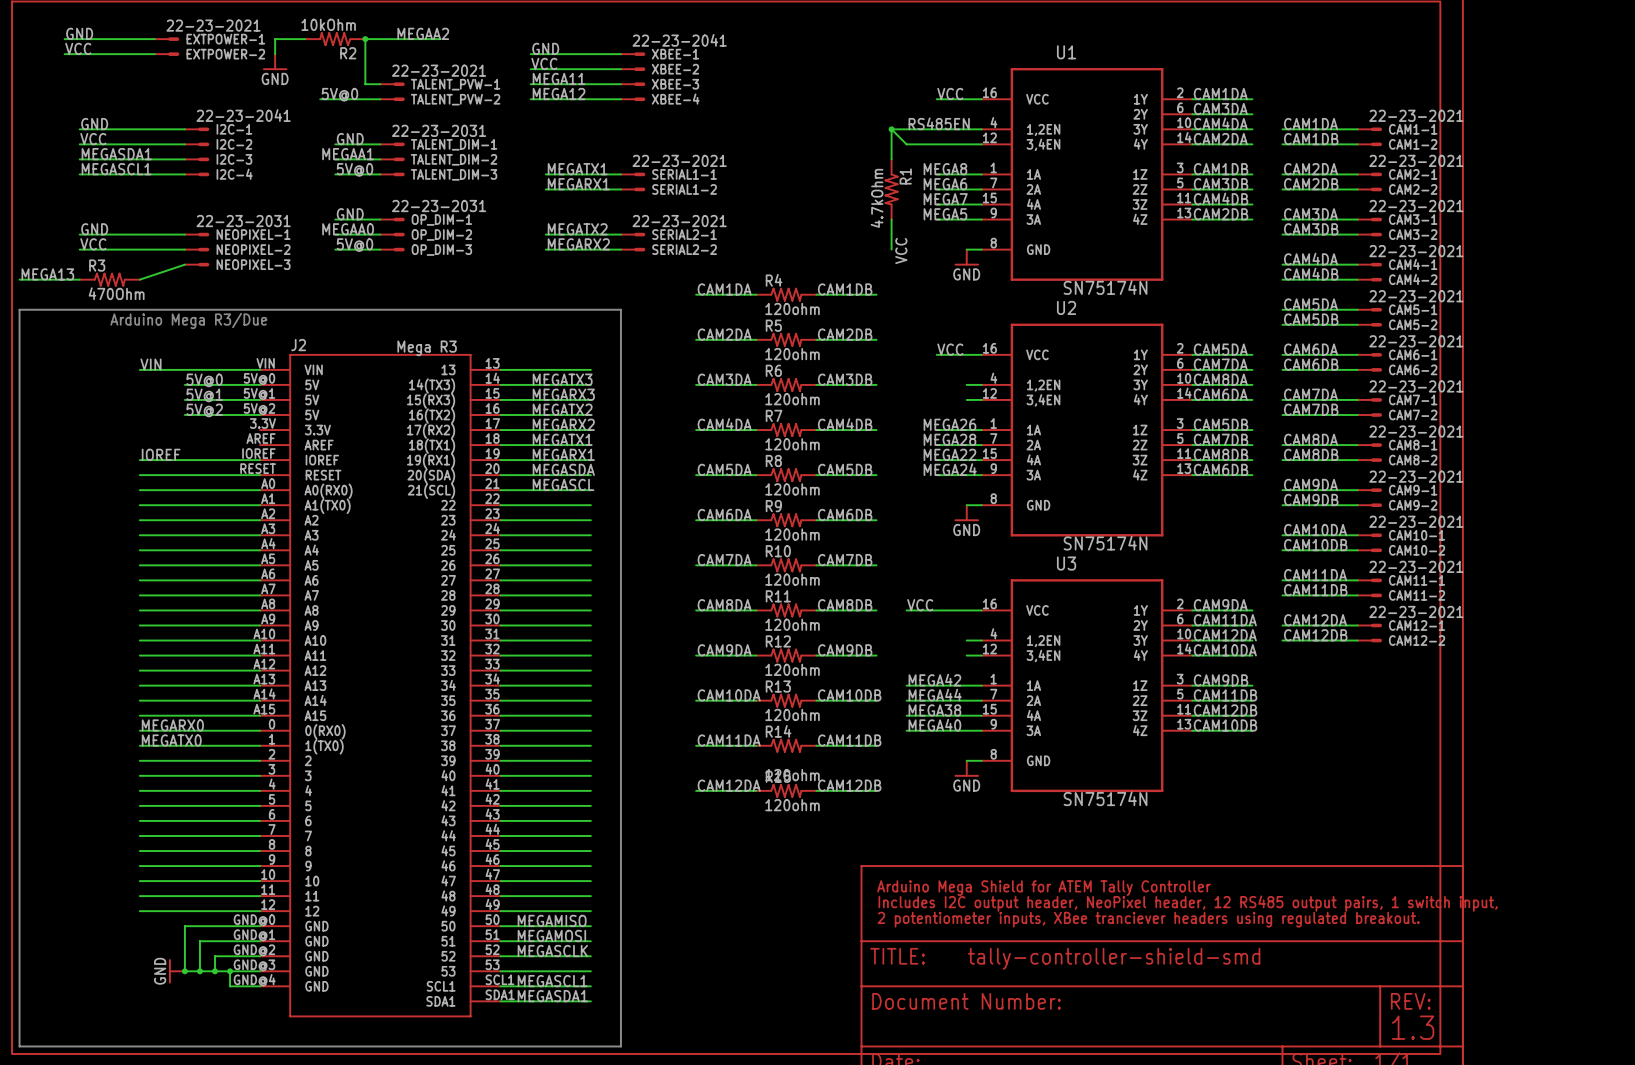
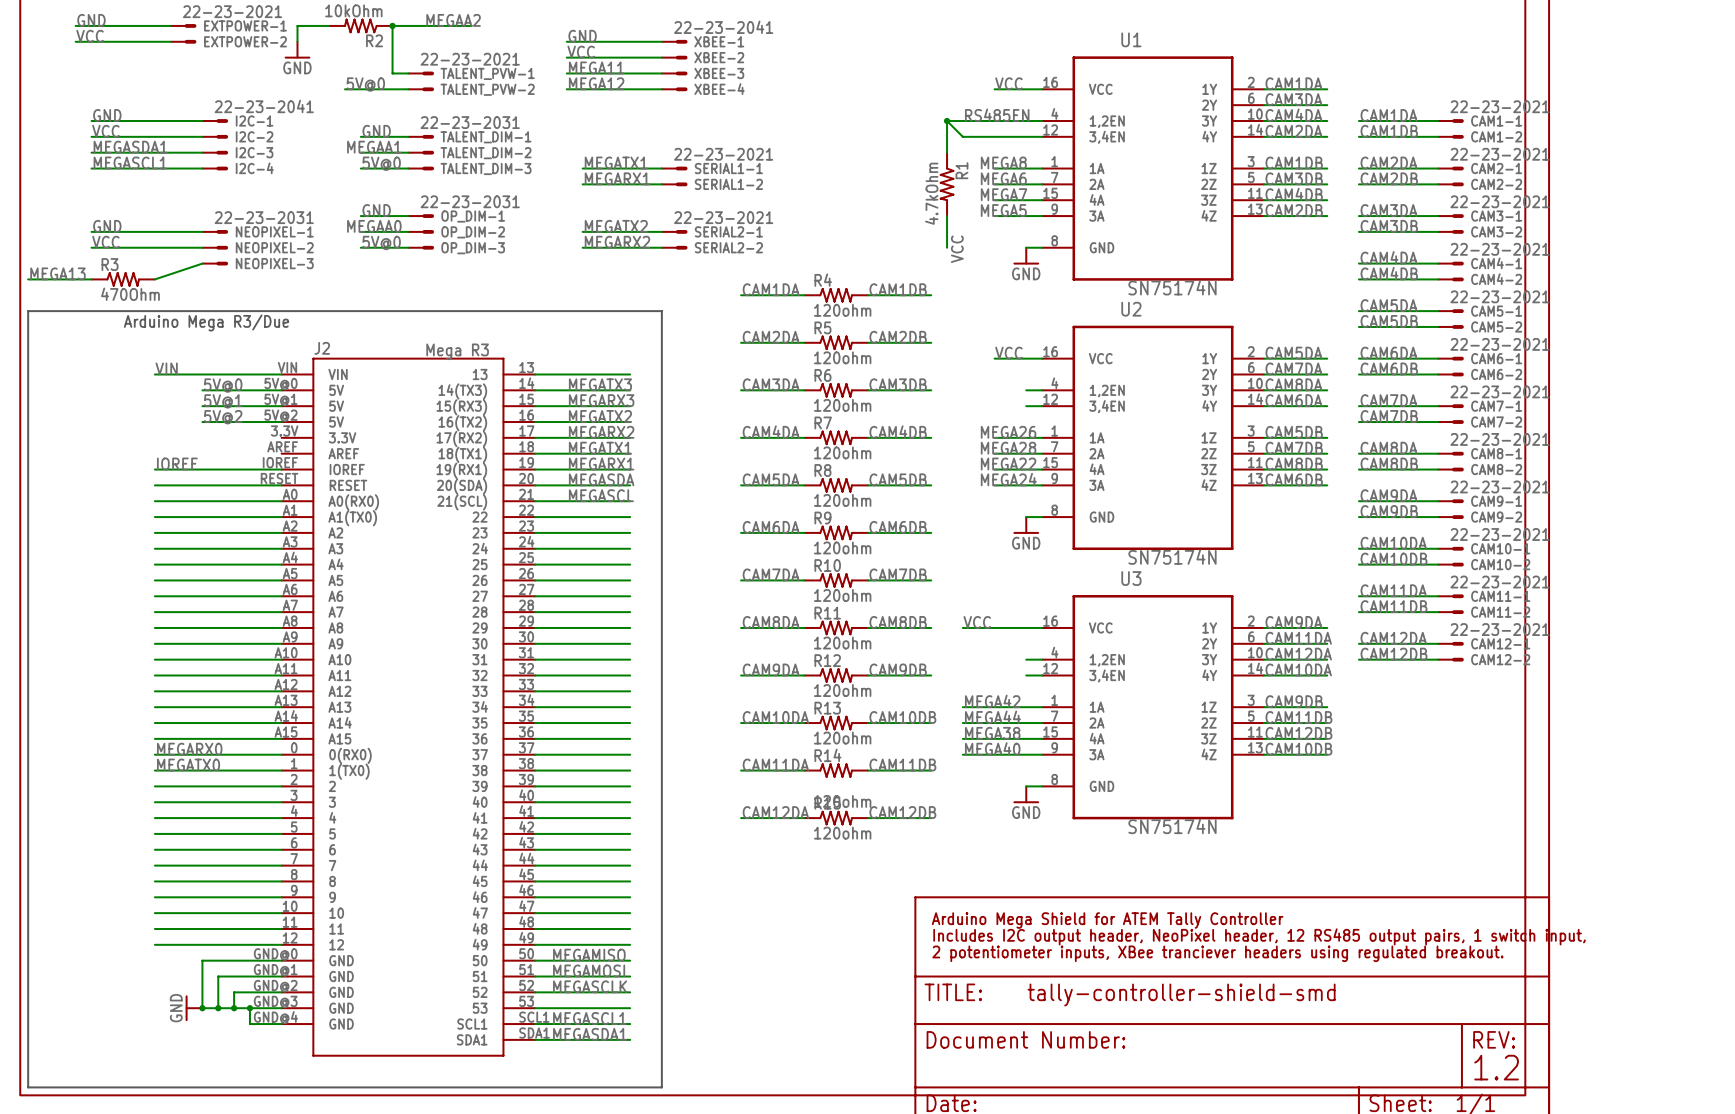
text: 1.3 (1413, 1027) -> 1.2 (1496, 1067)

